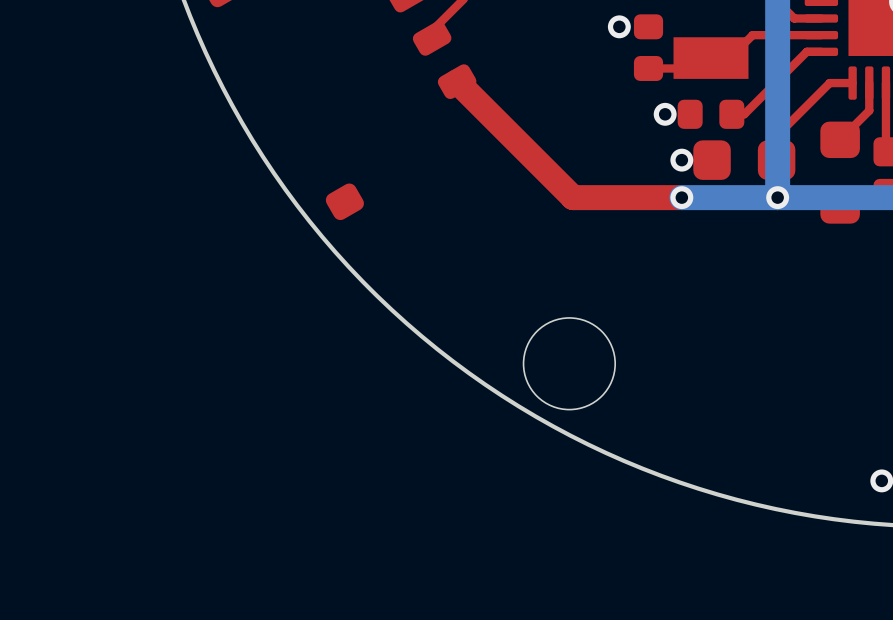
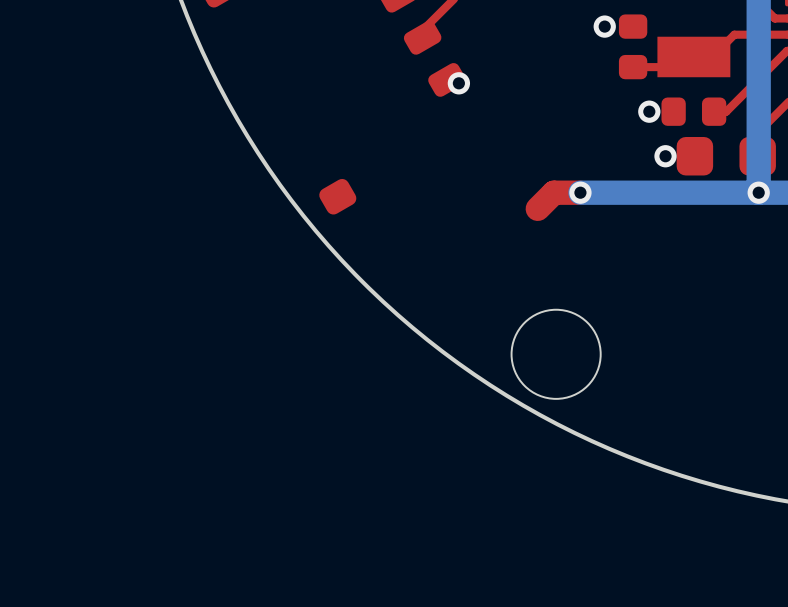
top track: (457, 81) (573, 197) -> (537, 208) (553, 192) (559, 192)
via: none -> (458, 83)
top track: (681, 197) (594, 197) -> none
bottom track: none -> (665, 192) (580, 192)
via position: (681, 197) -> (580, 192)

